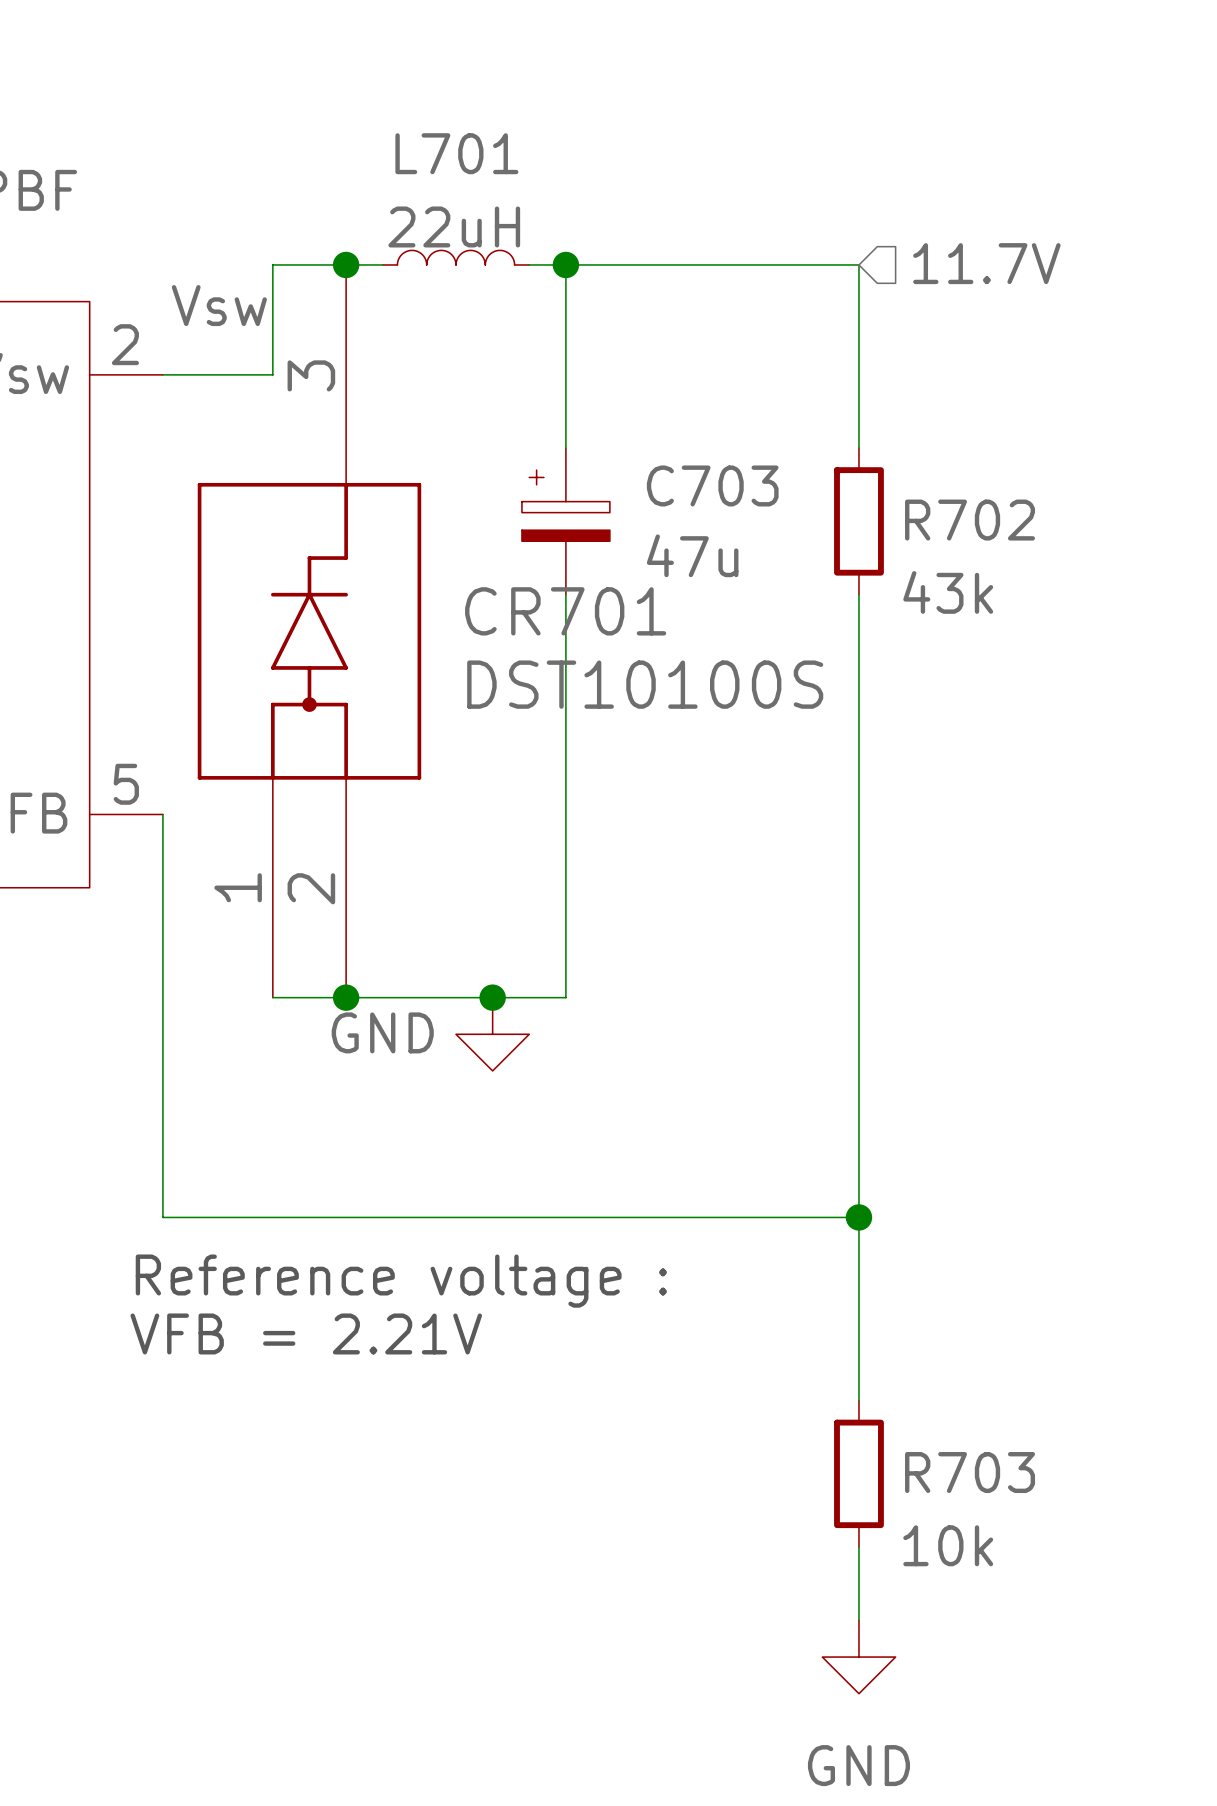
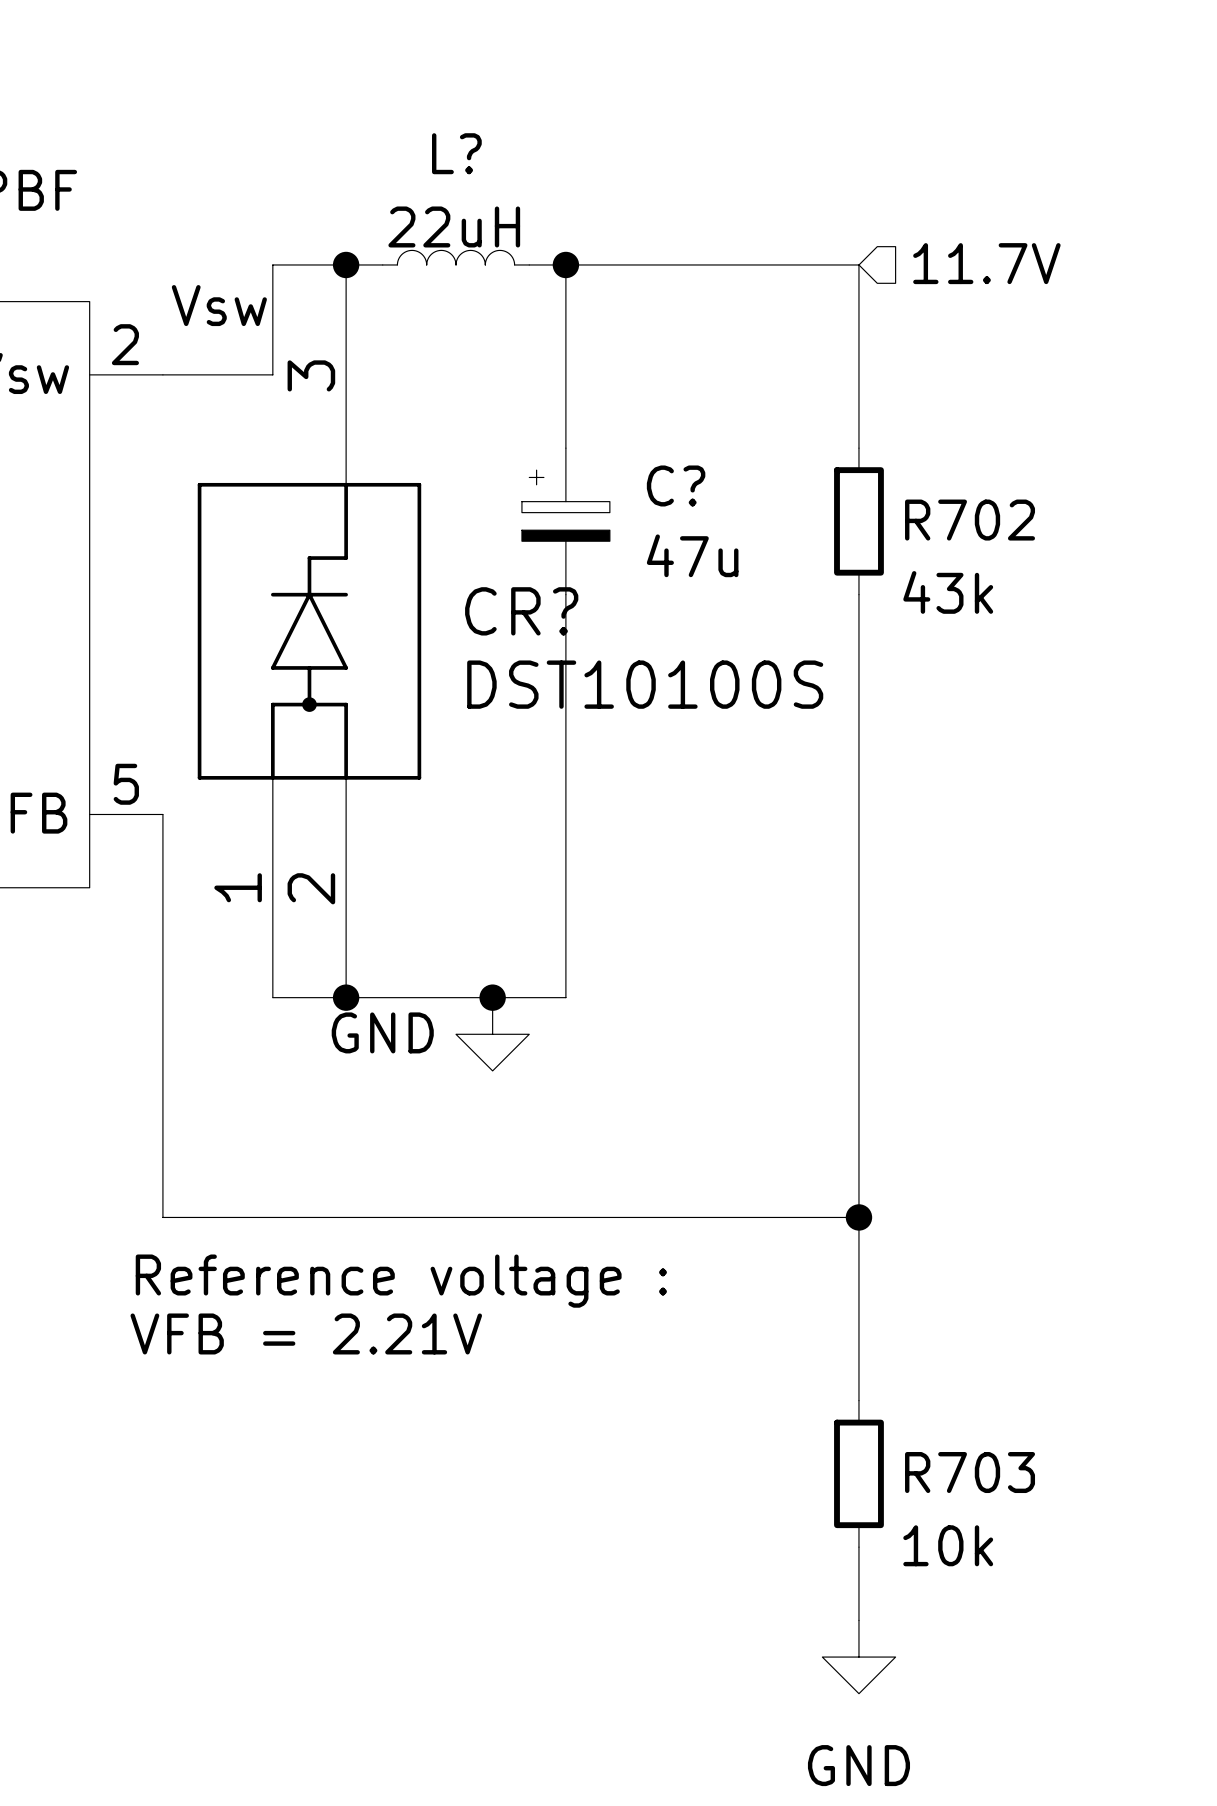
L701 name: L701 (456, 153) -> L? (456, 153)
C703 name: C703 (712, 485) -> C? (676, 485)
CR701 name: CR701 (565, 611) -> CR? (521, 611)

